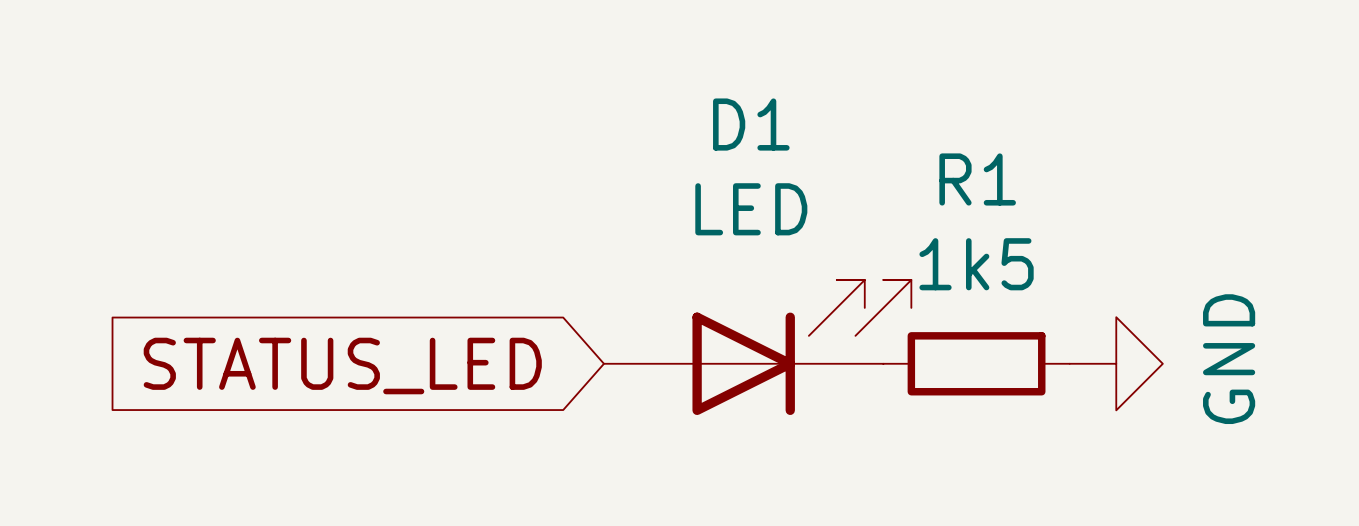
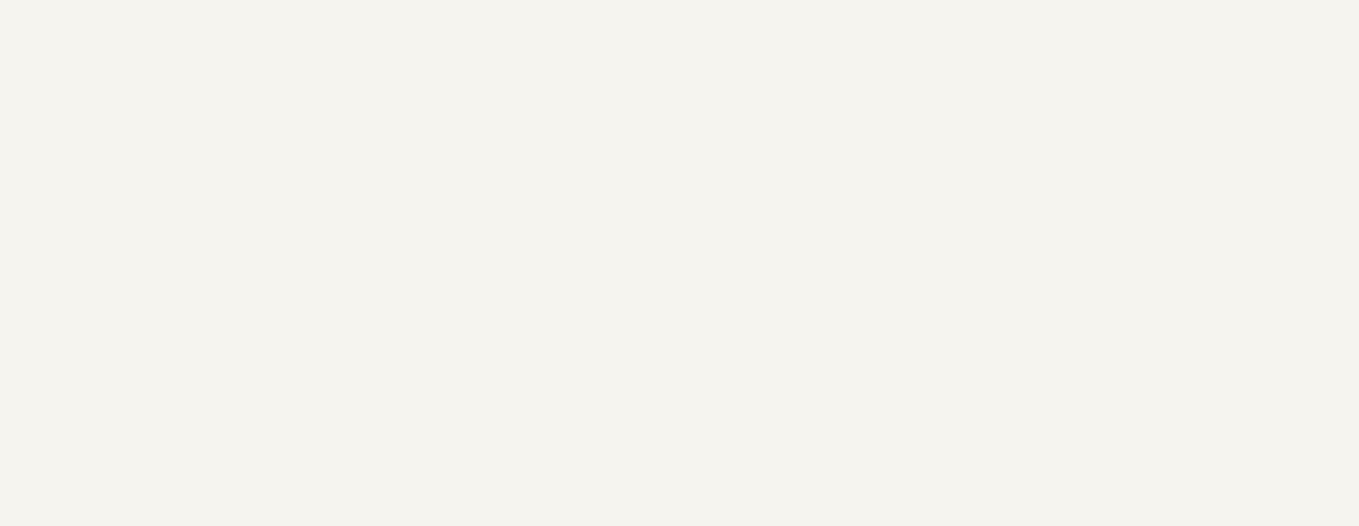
D1: LED (757, 347) -> none
R1: 1k5 (976, 363) -> none
power symbol: GND (1116, 363) -> none
global label: STATUS_LED (342, 366) -> none

